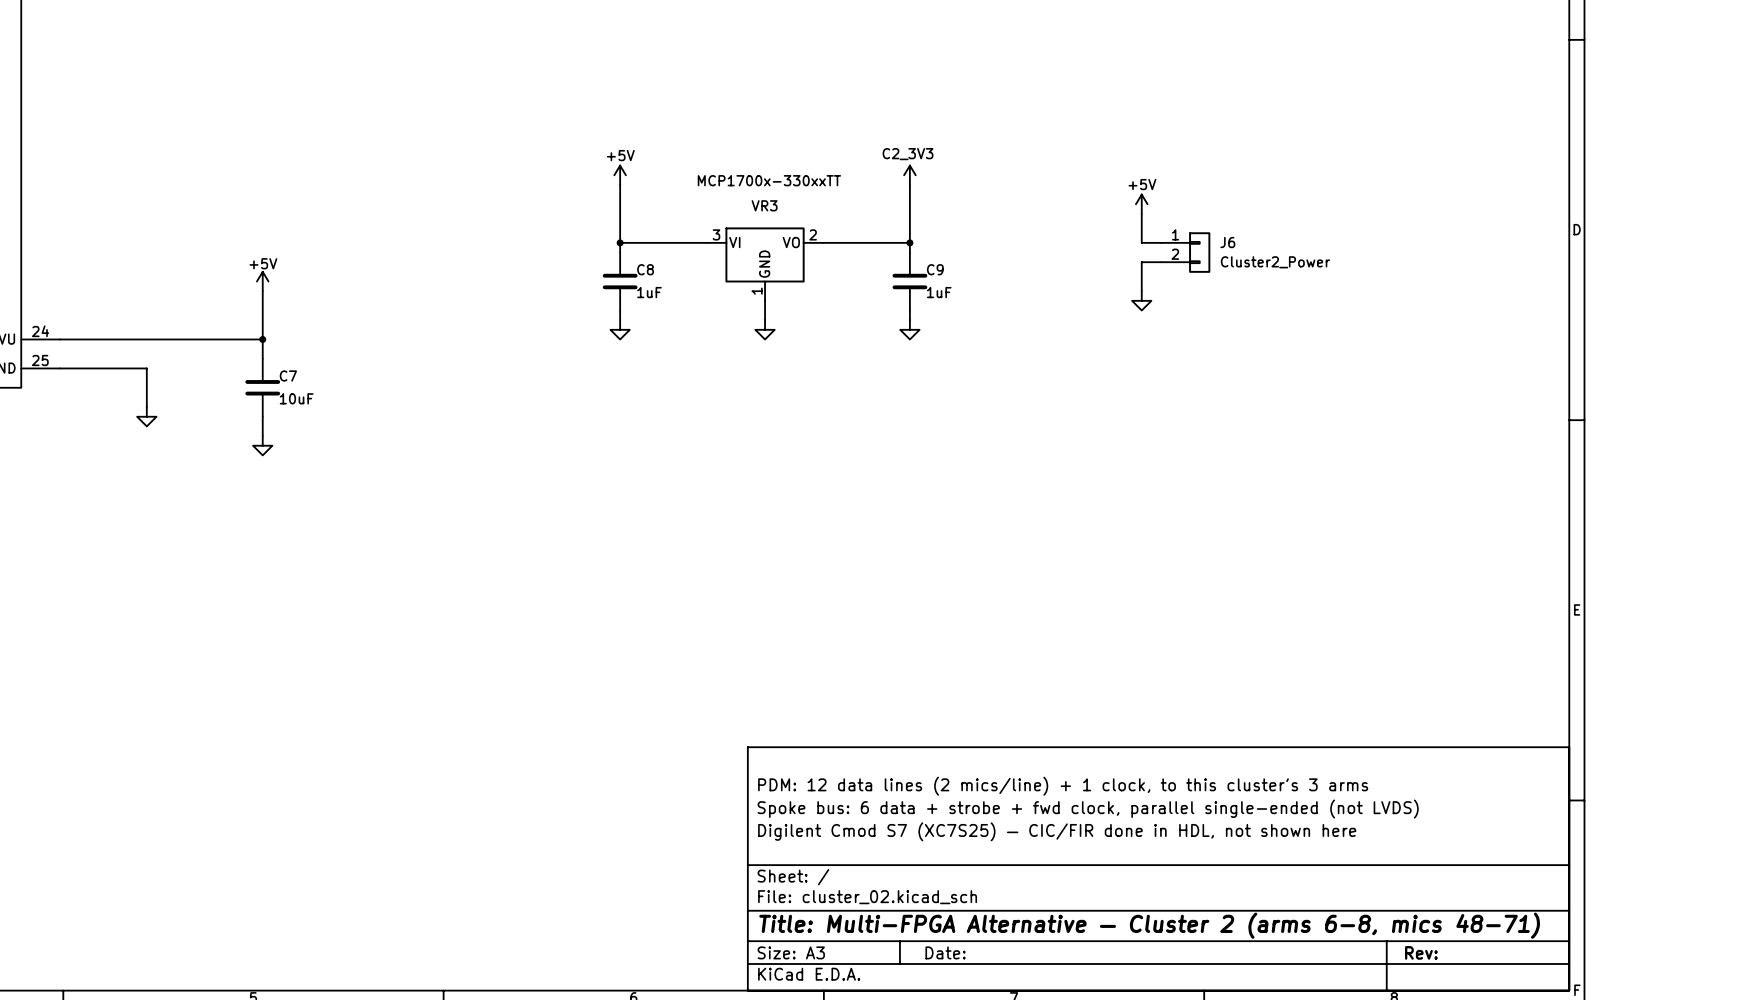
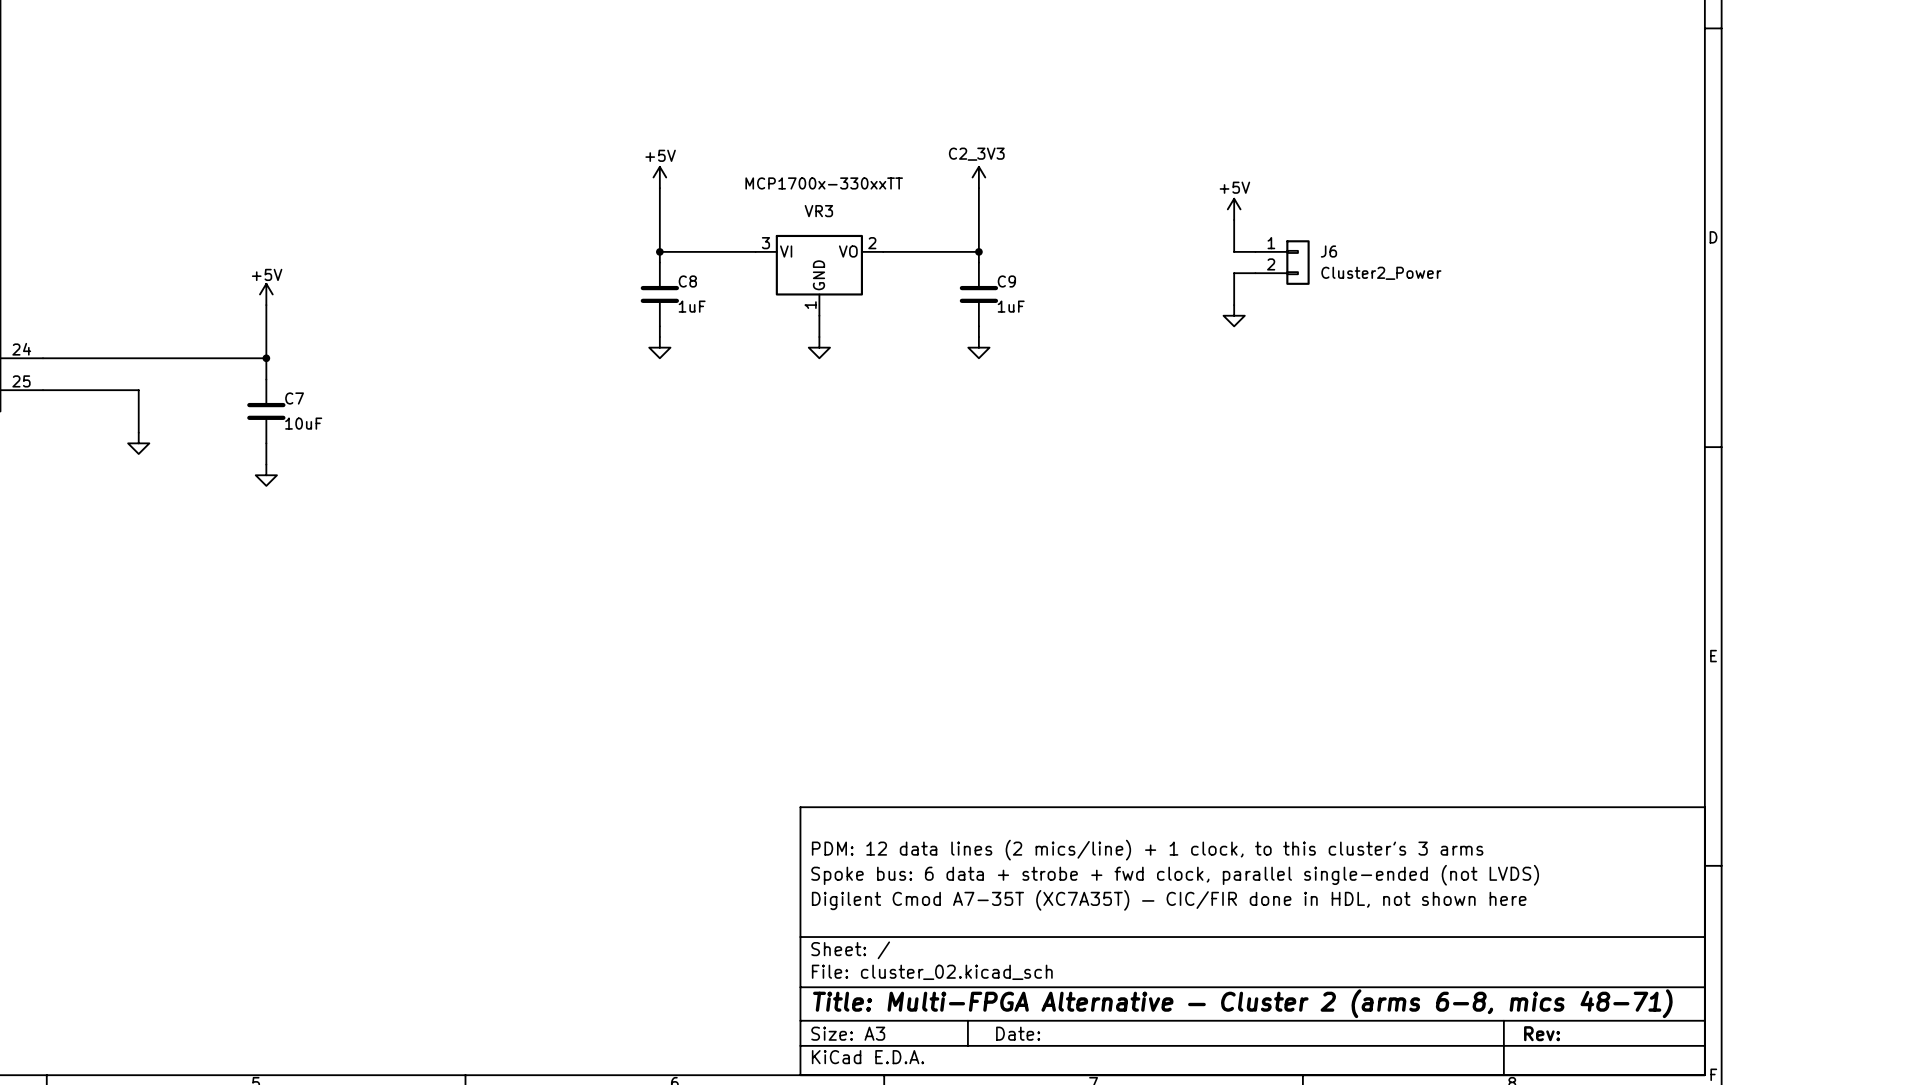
title block: Digilent Cmod S7 (XC7S25) — CIC/FIR done in HDL, not shown here (1057, 831) -> Digilent Cmod A7-35T (XC7A35T) — CIC/FIR done in HDL, not shown here (1169, 900)

